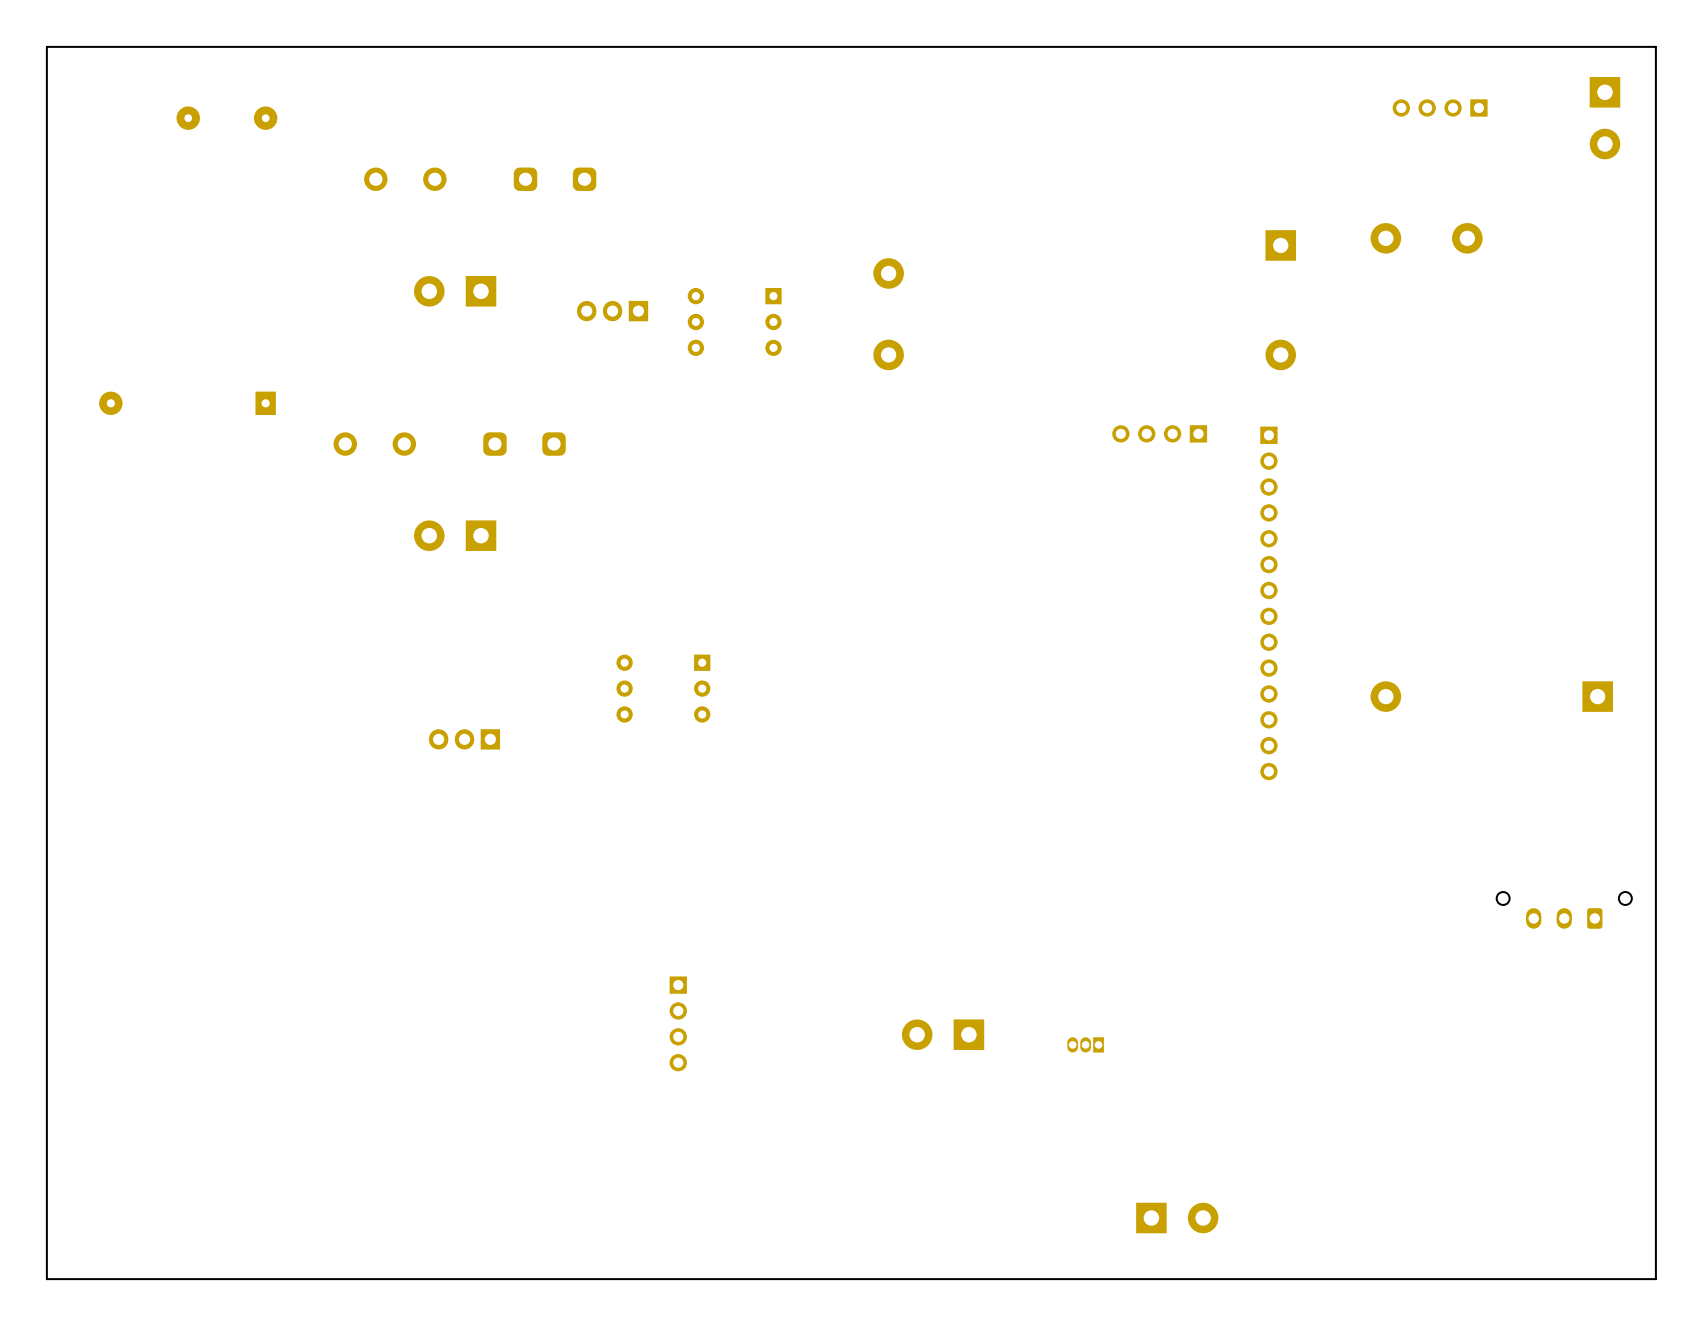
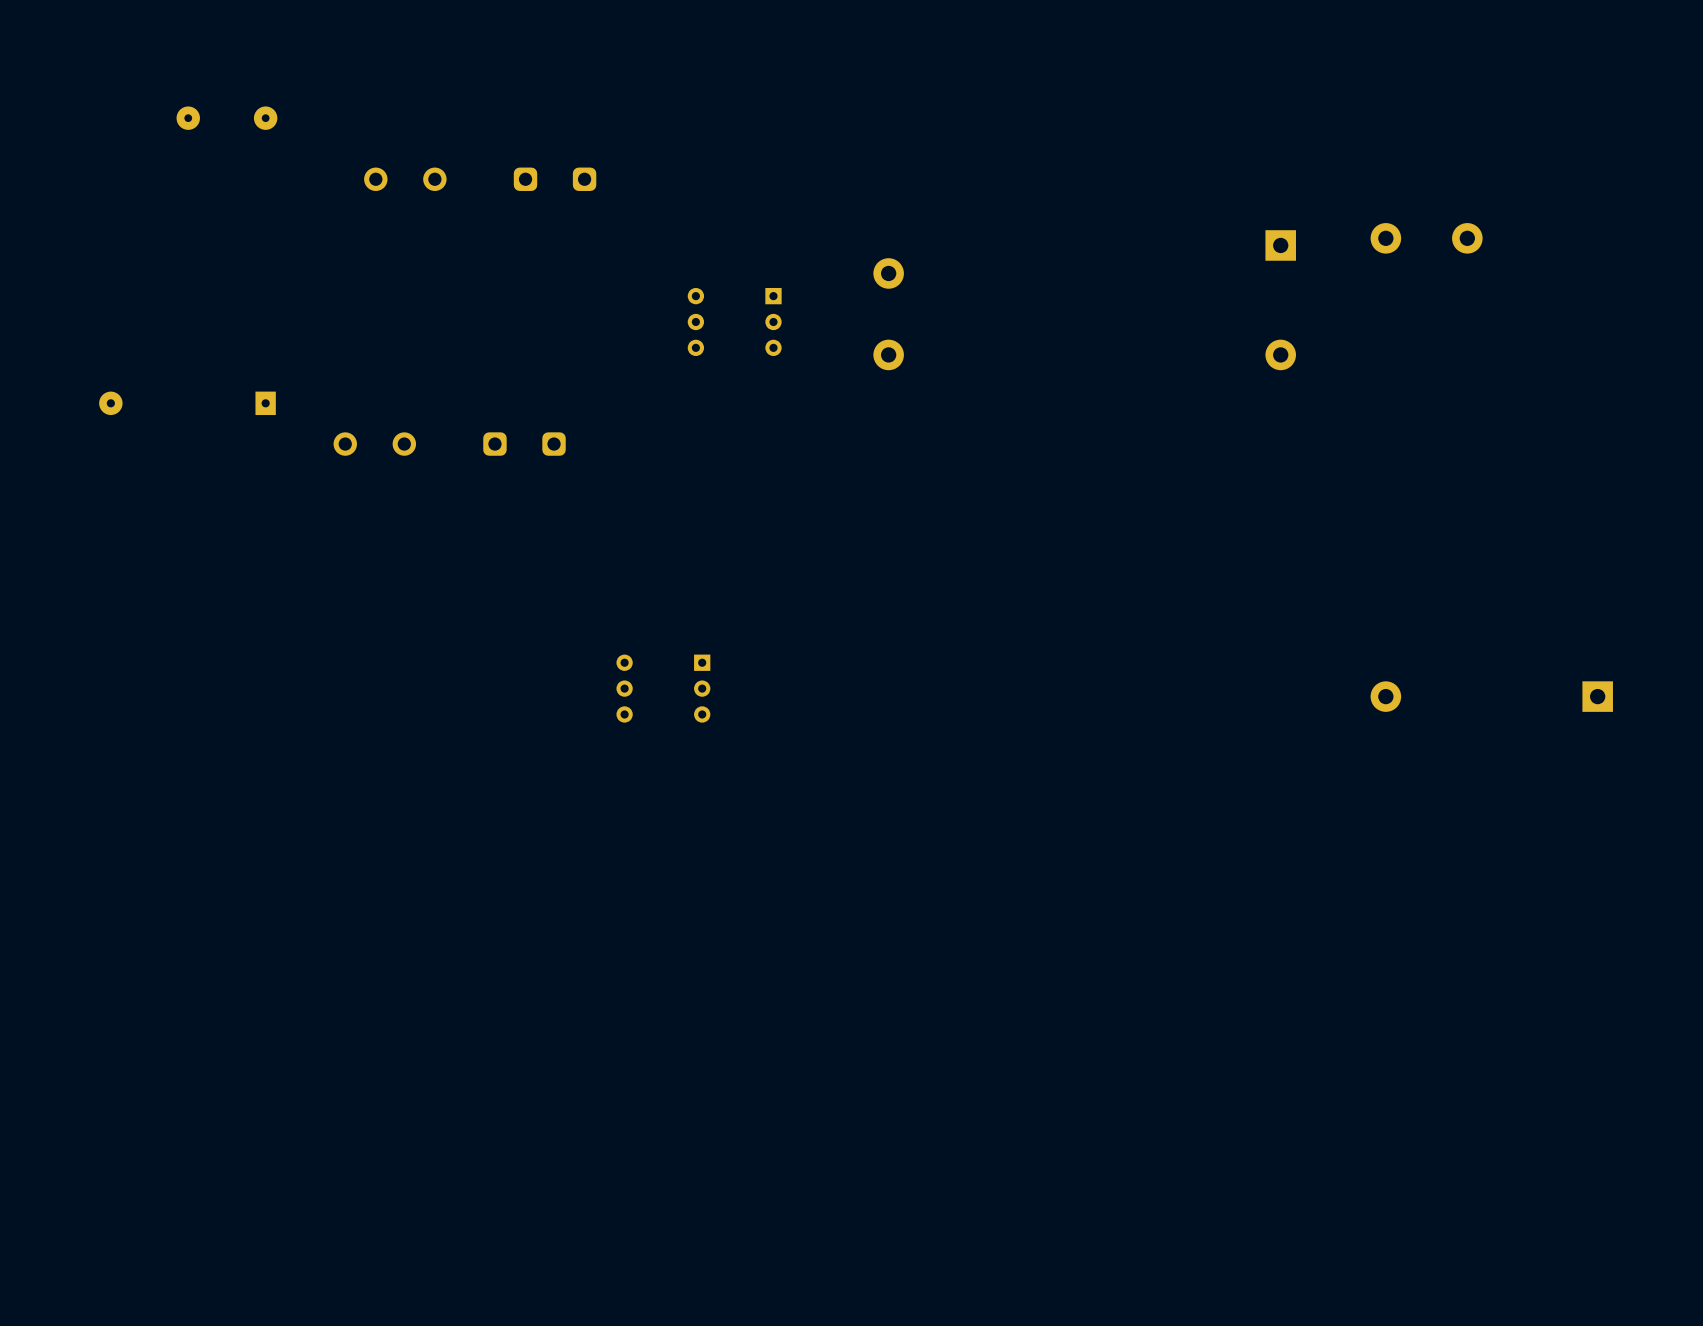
board edge: (1655, 46) (46, 46) (46, 1279) (1655, 1279) (1655, 46) -> none
part: (1440, 107) -> none
part: (1604, 118) -> none
part: (455, 291) -> none
part: (612, 311) -> none
part: (1159, 433) -> none
part: (455, 535) -> none
part: (1268, 603) -> none
part: (464, 739) -> none
part: (1564, 910) -> none
part: (678, 1023) -> none
part: (943, 1034) -> none
part: (1085, 1044) -> none
part: (1177, 1218) -> none

